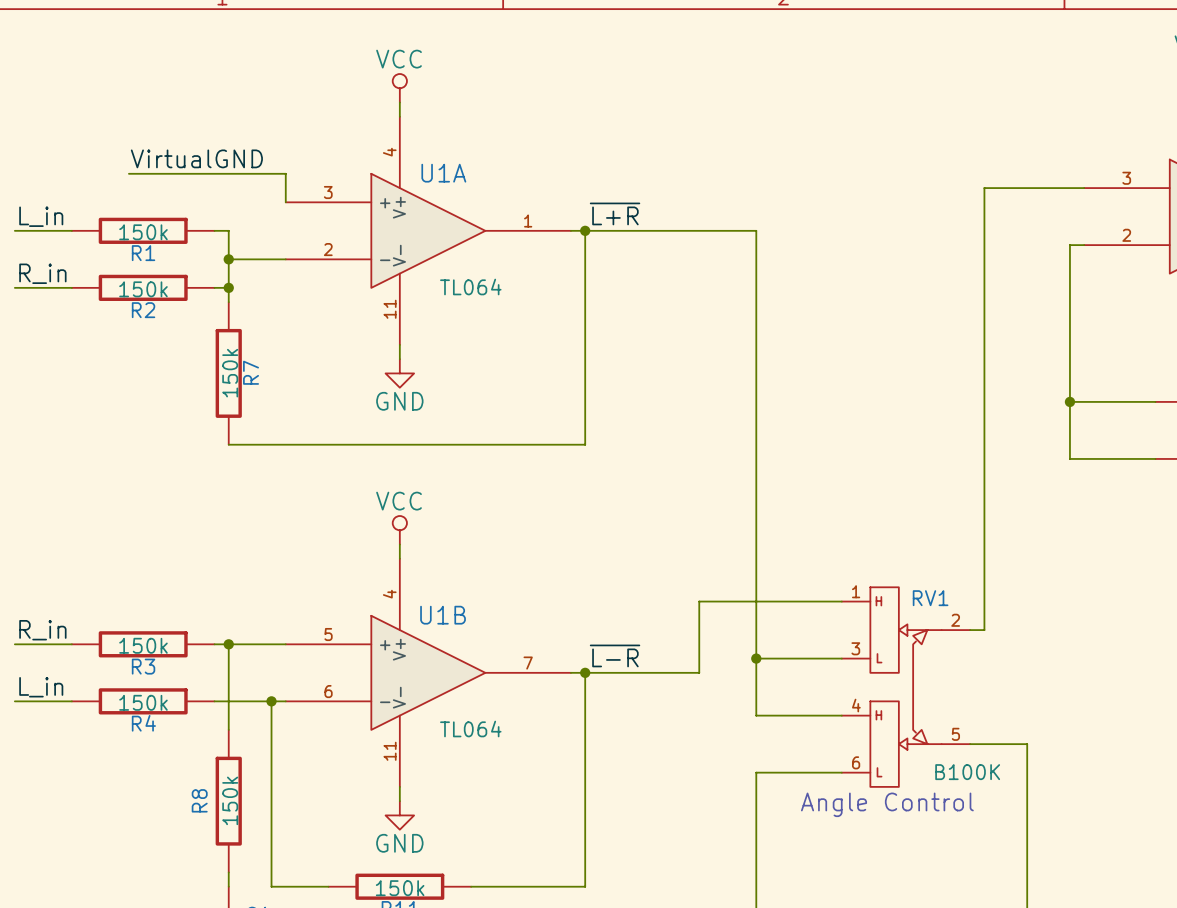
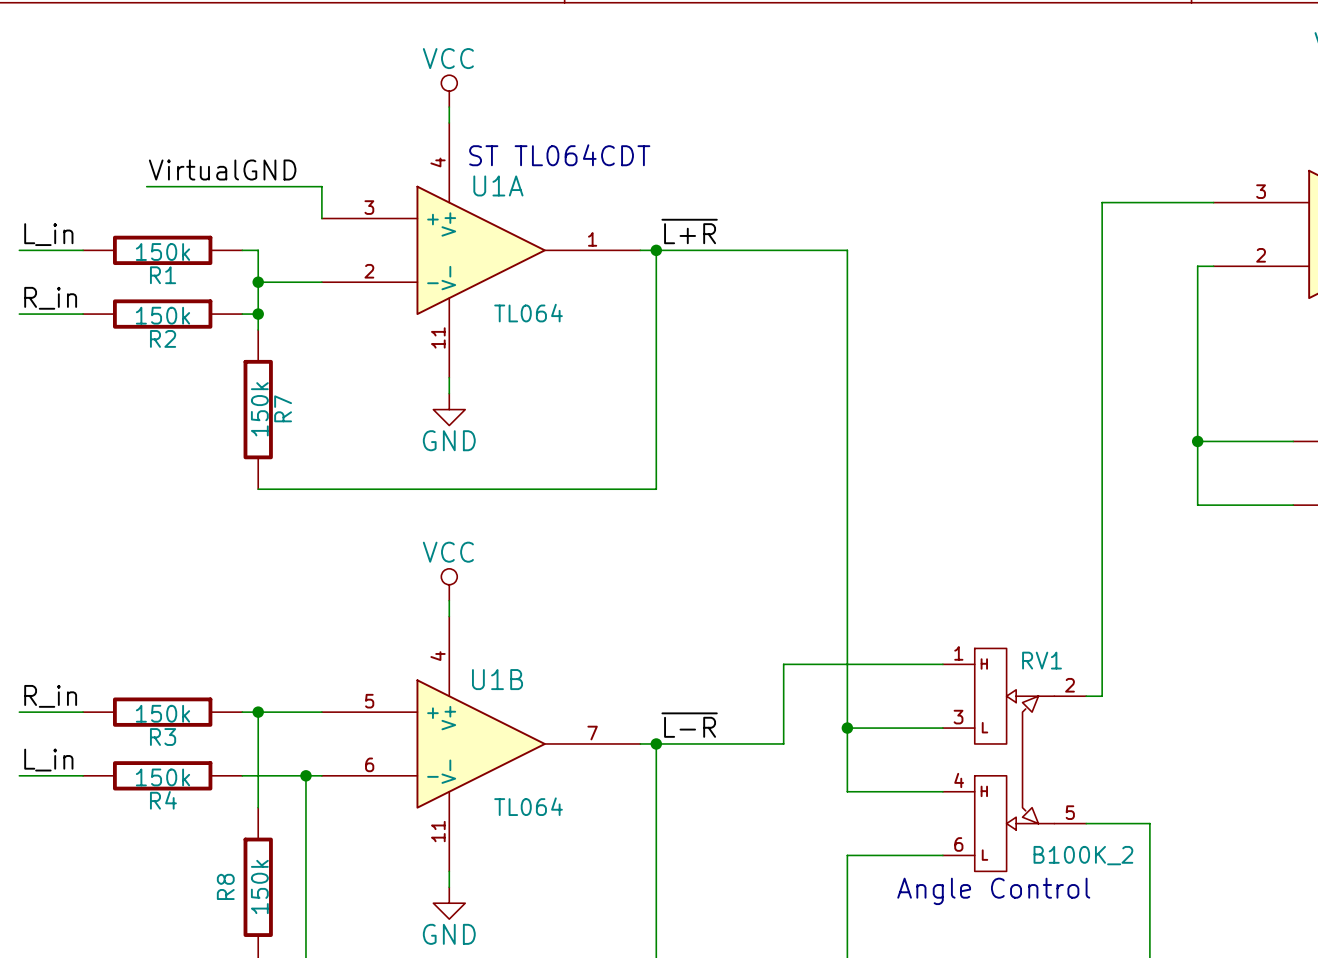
text: none -> ST TL064CDT (559, 155)
RV1 value: B100K (967, 772) -> B100K_2 (1083, 855)

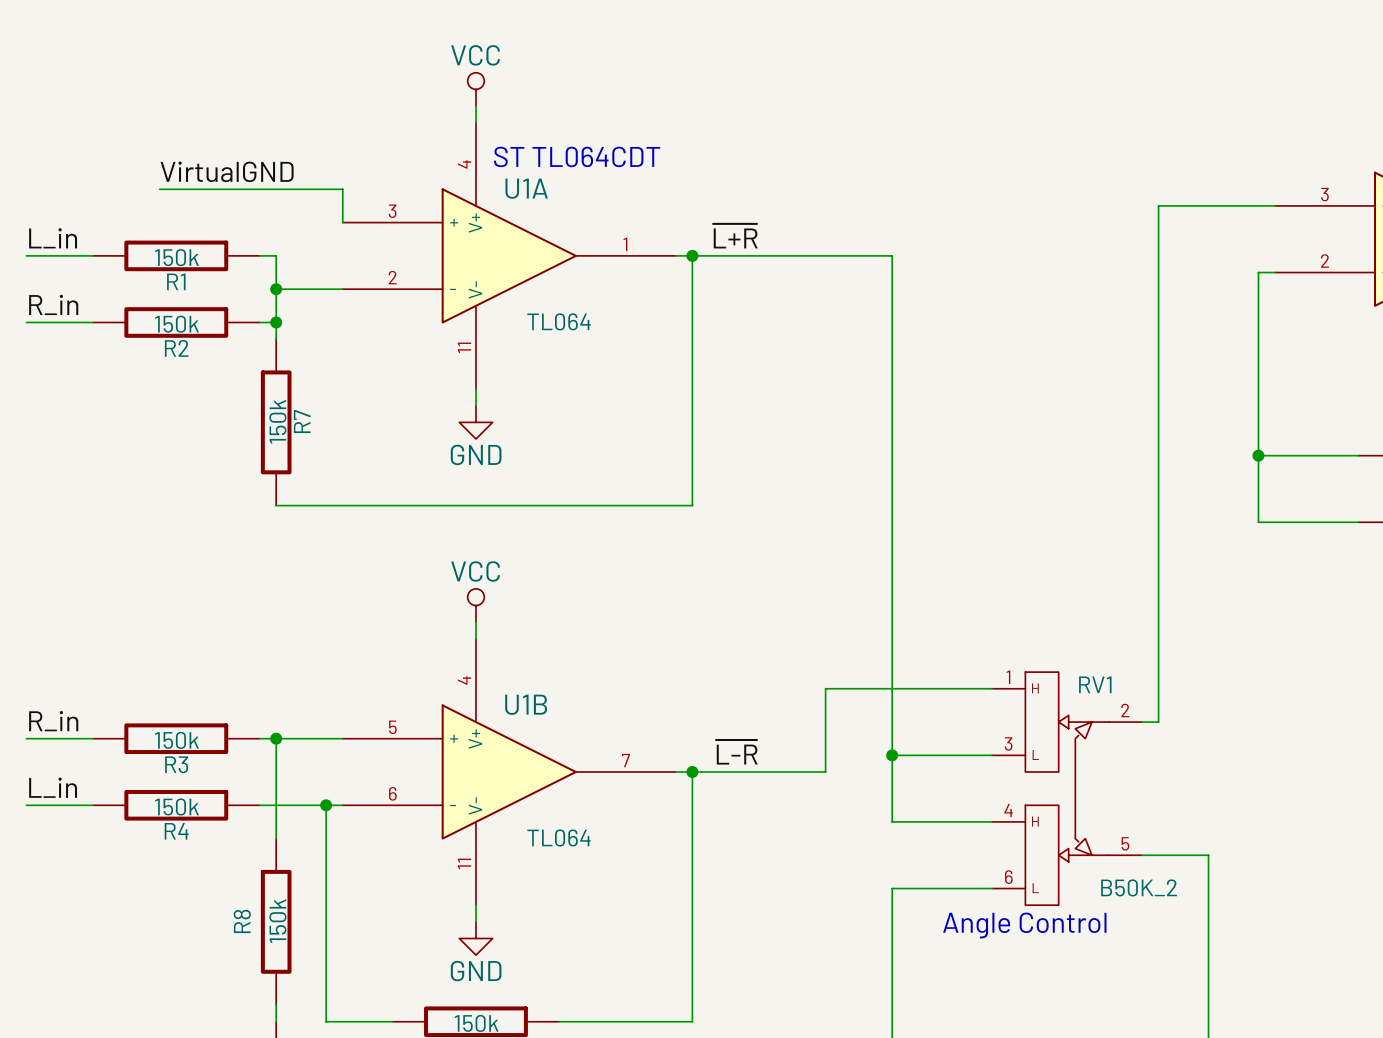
RV1 value: B100K_2 (1083, 855) -> B50K_2 (1139, 887)

